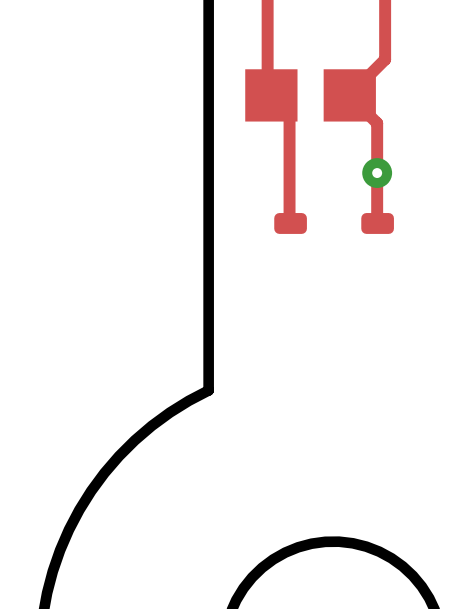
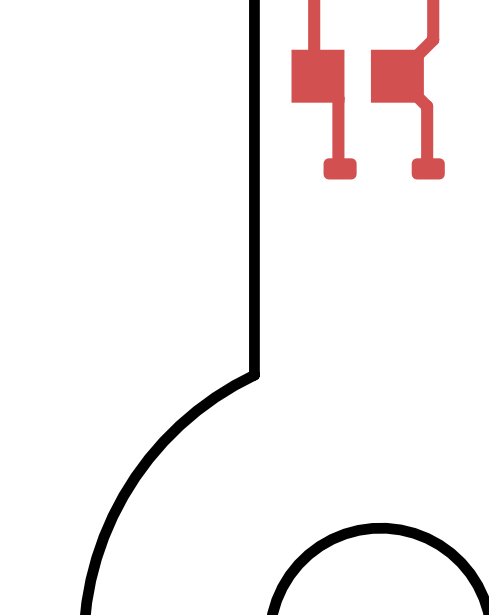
top track: (289, 115) (290, 223) -> (336, 96) (338, 98) (338, 166) (340, 168)
top track: (377, 123) (377, 223) -> (425, 104) (427, 106) (428, 168)
via: (377, 173) -> none
part position: (334, 223) -> (384, 168)

